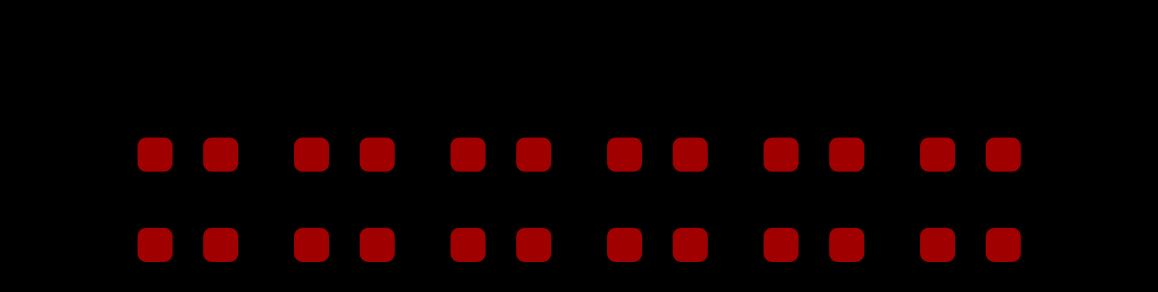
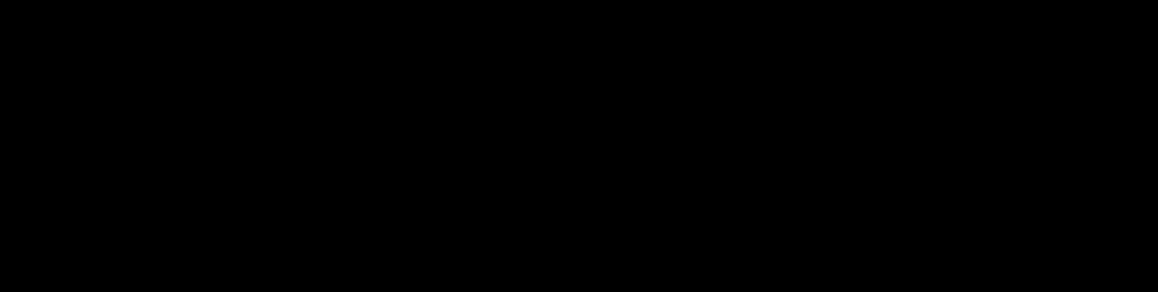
part: (187, 154) -> none
part: (344, 154) -> none
part: (500, 154) -> none
part: (657, 154) -> none
part: (813, 154) -> none
part: (970, 154) -> none
part: (187, 244) -> none
part: (344, 244) -> none
part: (500, 244) -> none
part: (657, 244) -> none
part: (813, 244) -> none
part: (970, 244) -> none

